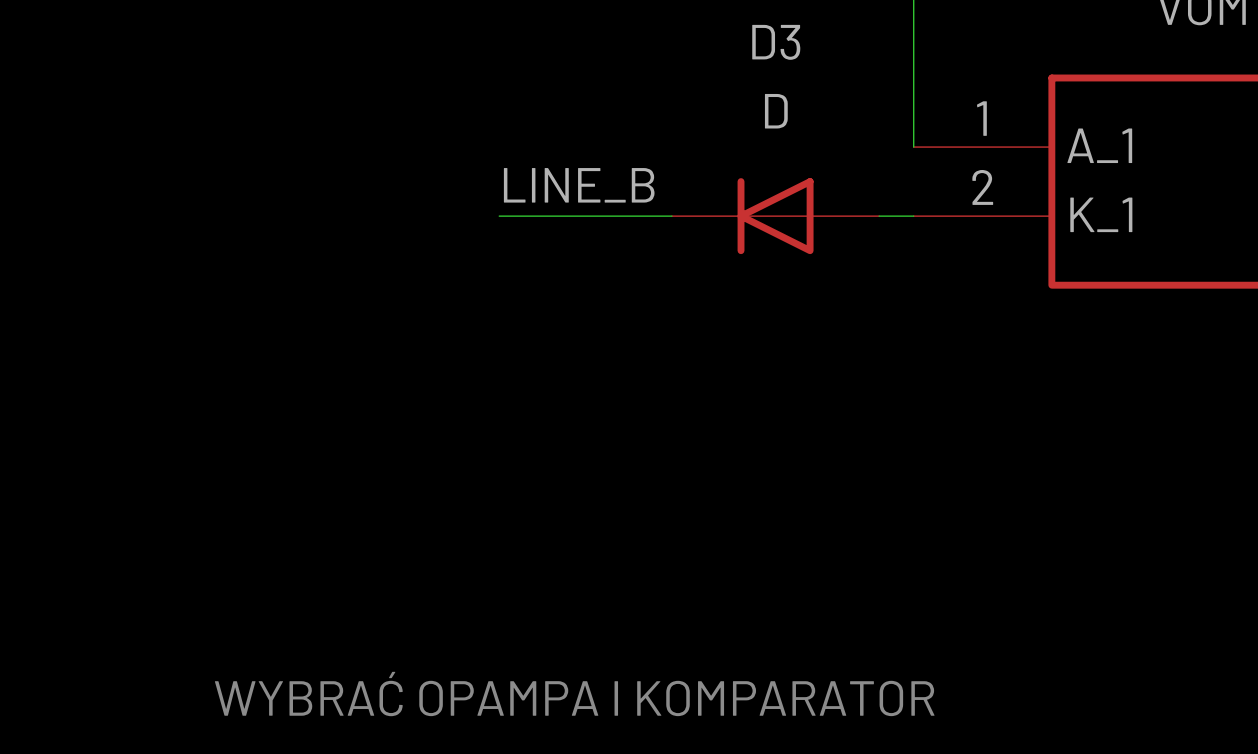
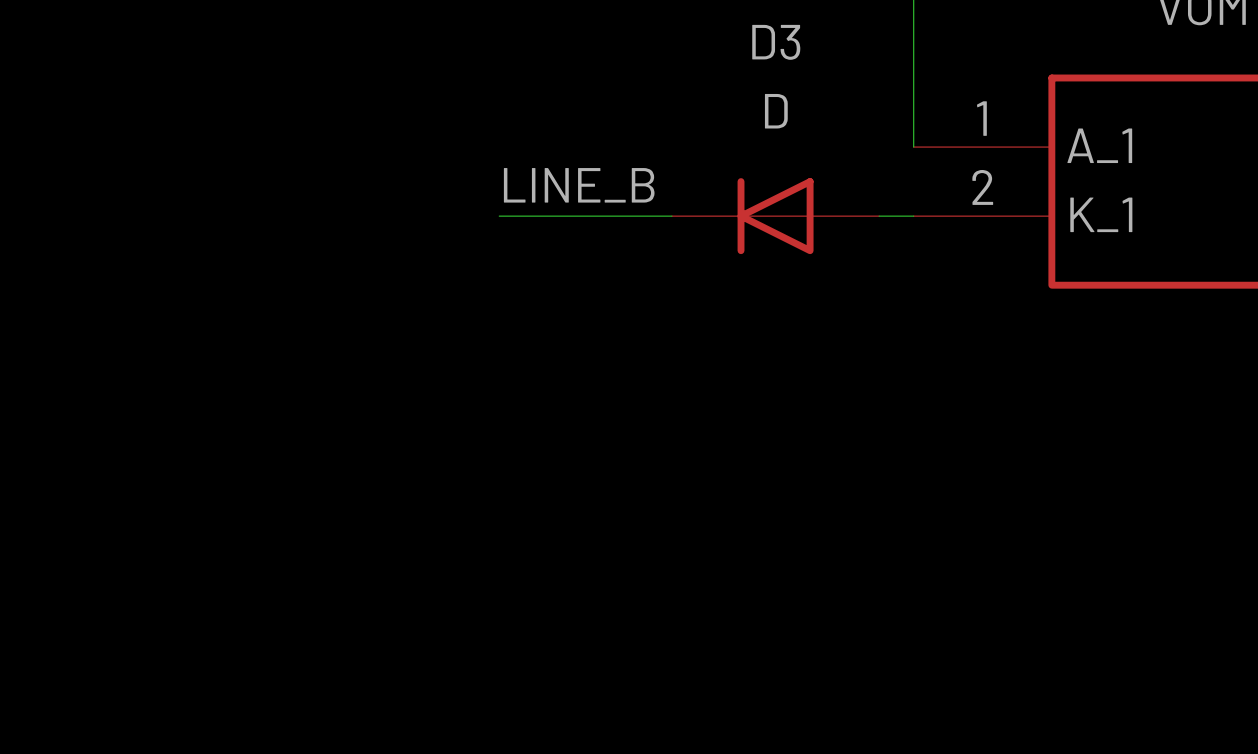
text: WYBRAĆ OPAMPA I KOMPARATOR (574, 694) -> none

